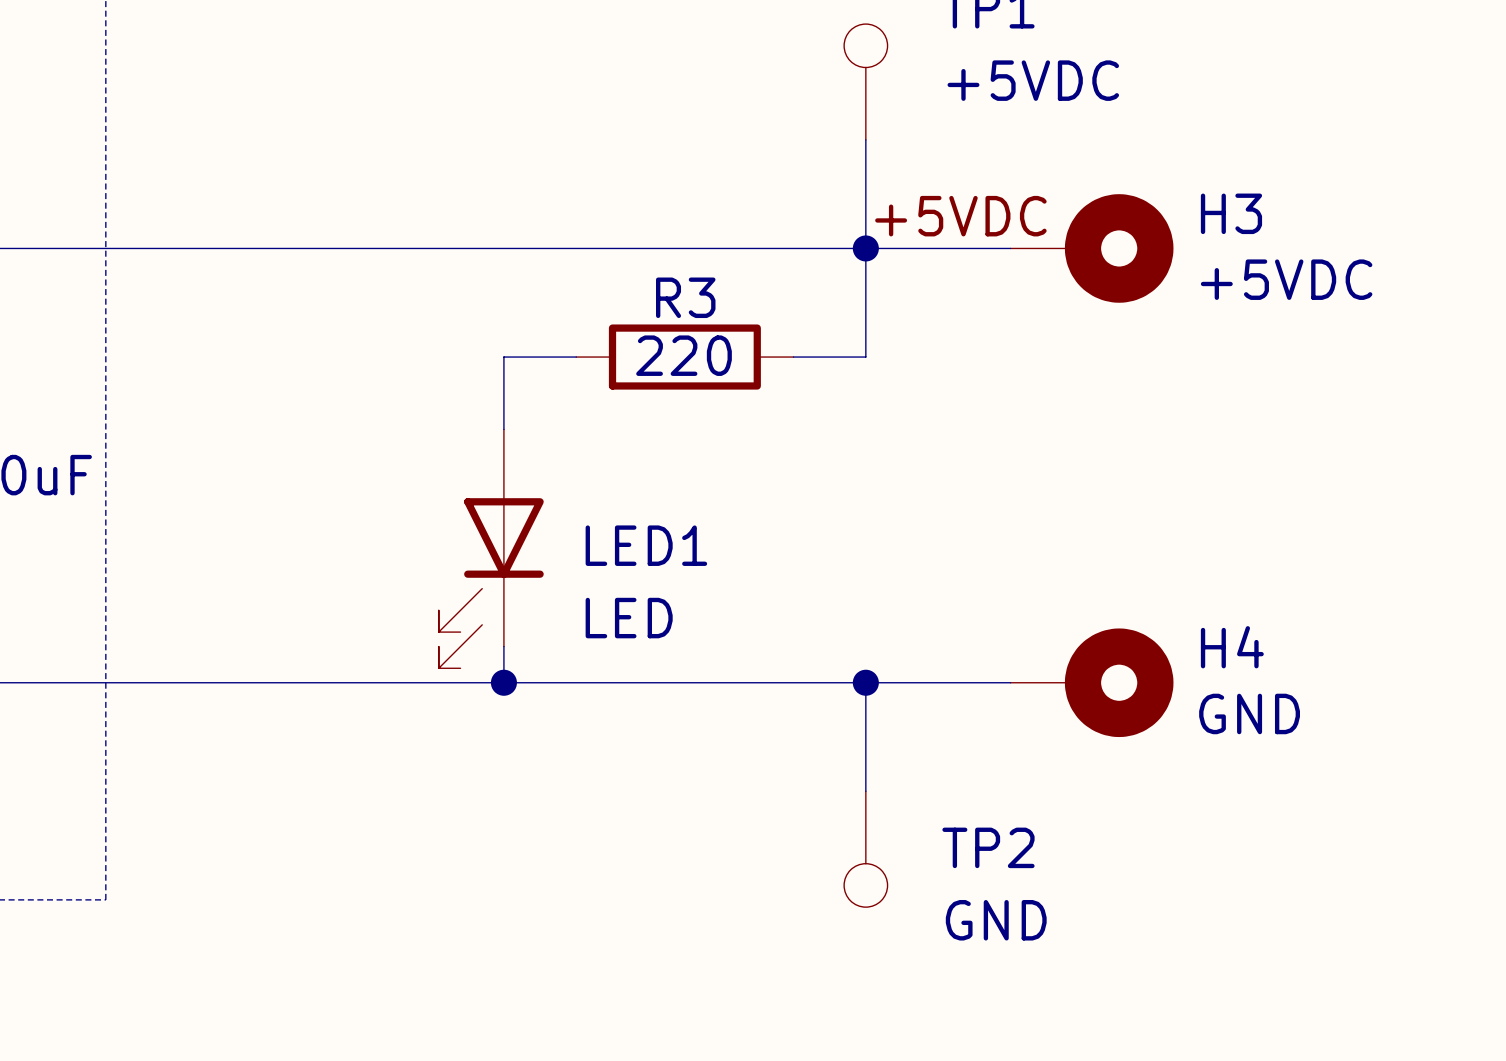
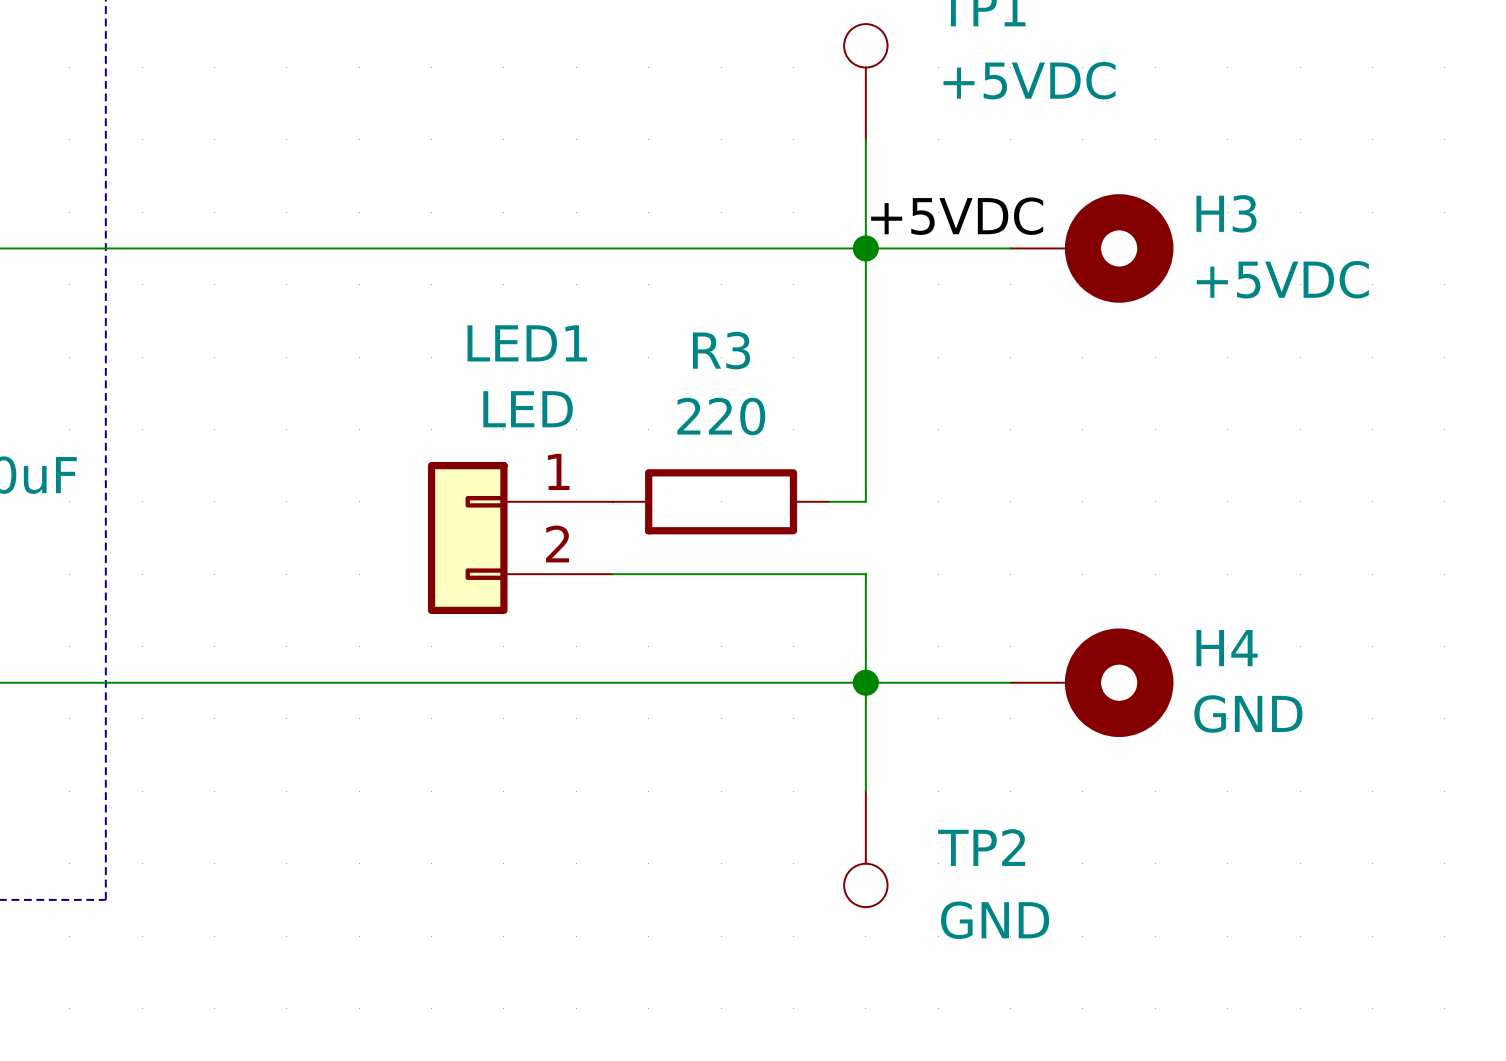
R3 name position: R3 (685, 297) -> R3 (721, 350)
R3 value position: 220 (684, 355) -> 220 (721, 416)
wire: (576, 357) (503, 357) (503, 429) -> none
R3 position: (684, 357) -> (721, 501)
wire: (793, 357) (865, 357) -> (829, 501) (865, 501) (865, 357)
LED1 symbol: [438, 429, 544, 669] -> [427, 461, 613, 614]
LED1 name position: LED1 (646, 545) -> LED1 (527, 343)
wire: none -> (612, 574) (865, 574) (865, 682)
LED1 value position: LED (629, 618) -> LED (528, 409)
wire: (503, 646) (503, 682) -> none
junction: (503, 682) -> none

